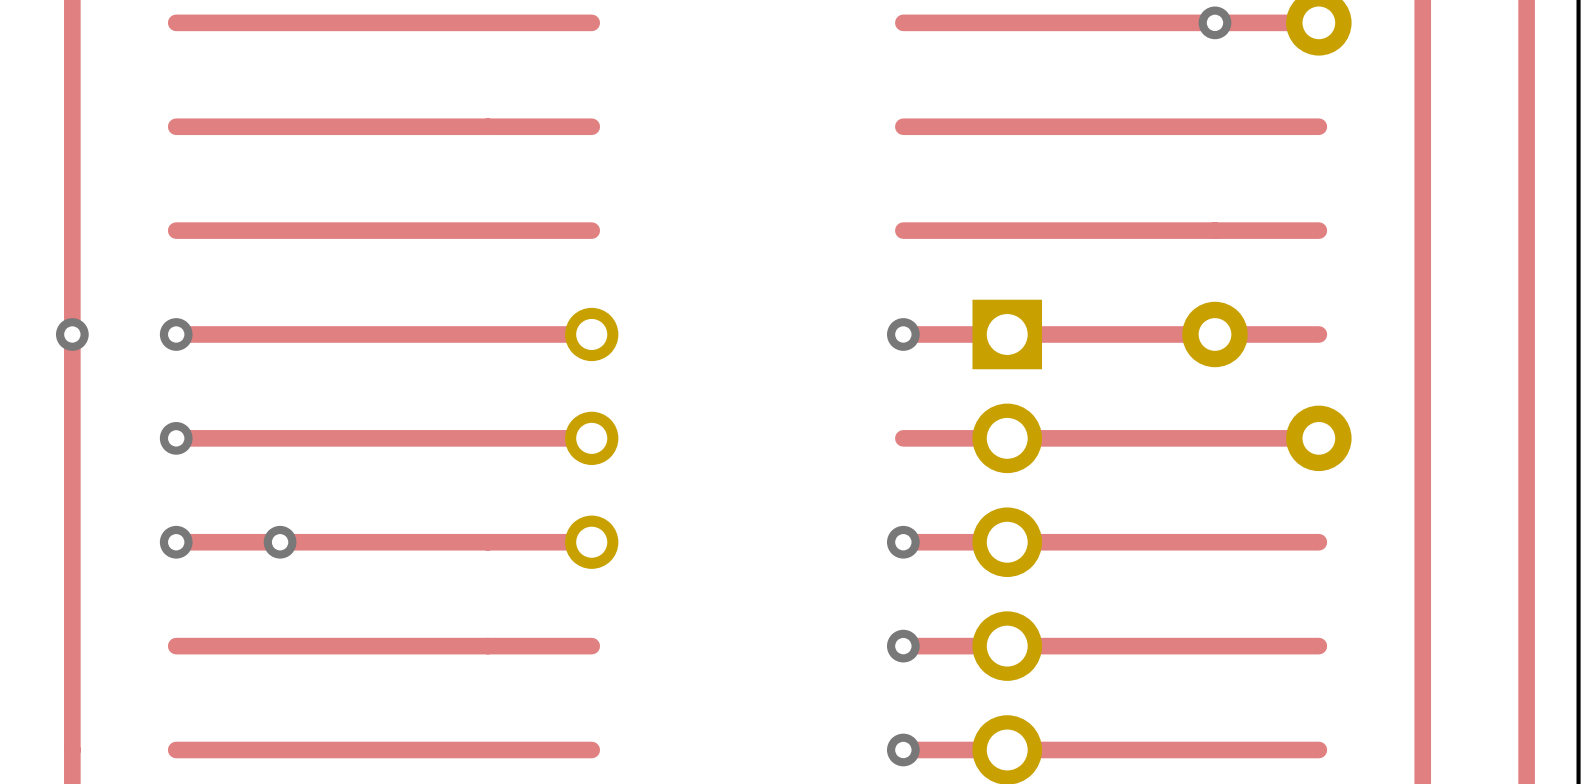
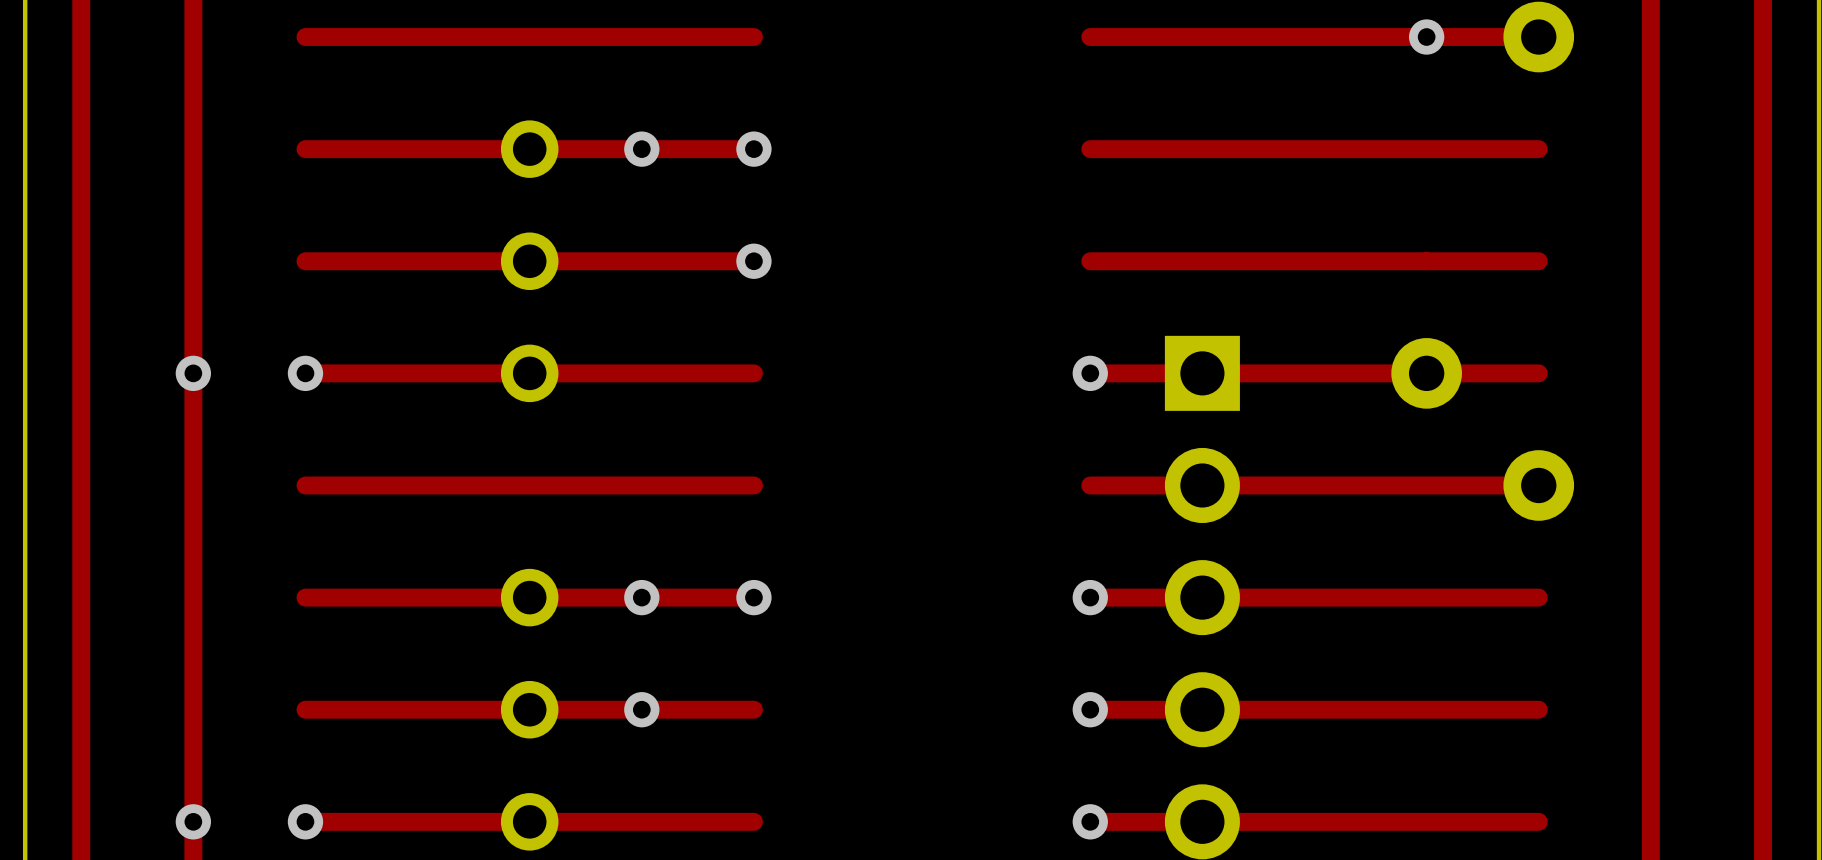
via: none -> (641, 149)
via: none -> (753, 149)
part: none -> (529, 261)
via: none -> (753, 261)
via: (176, 438) -> none
part: (591, 438) -> none
via: (176, 542) -> none
via: (280, 542) -> none
via: none -> (641, 597)
via: none -> (753, 597)
part: none -> (529, 709)
via: none -> (641, 709)
via: none -> (193, 821)
via: none -> (305, 821)

